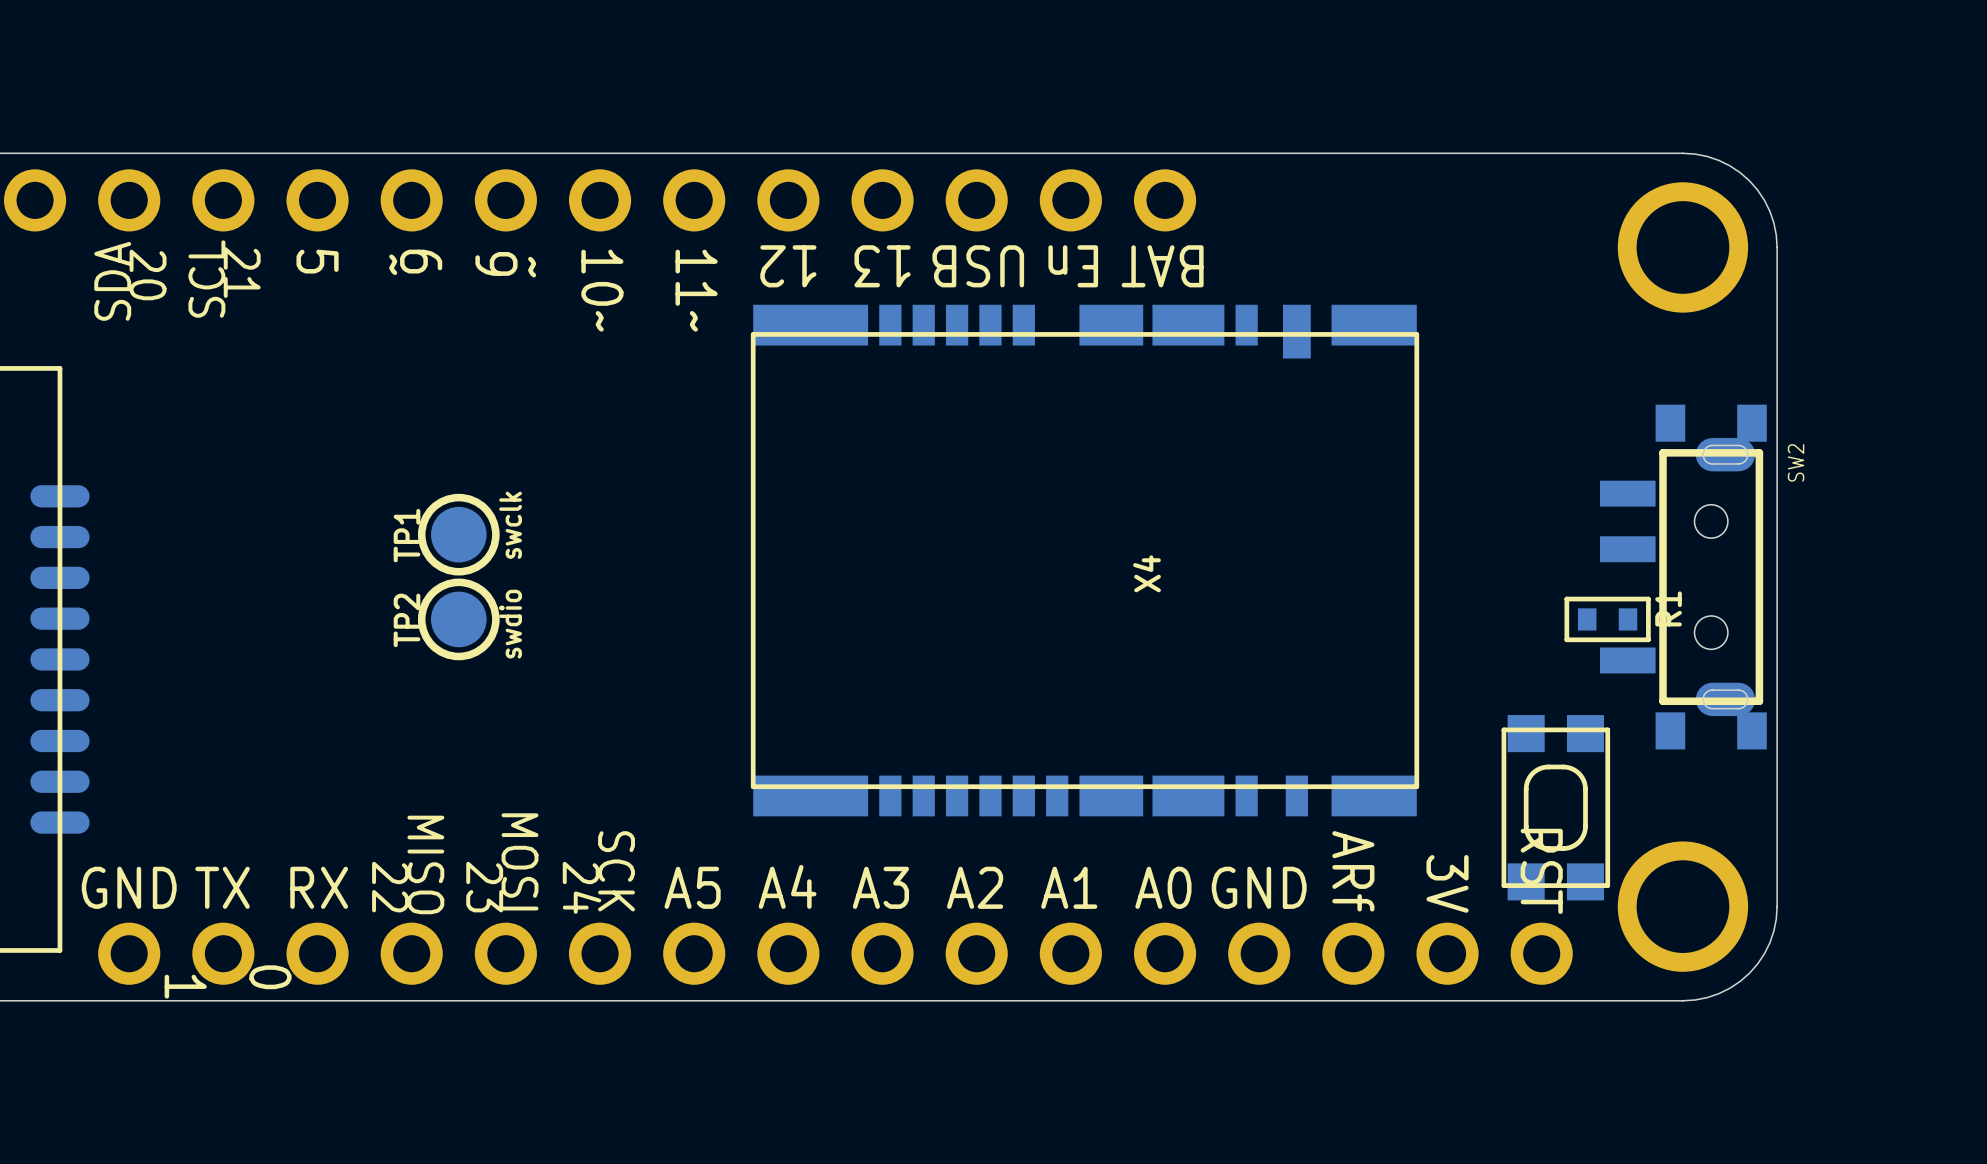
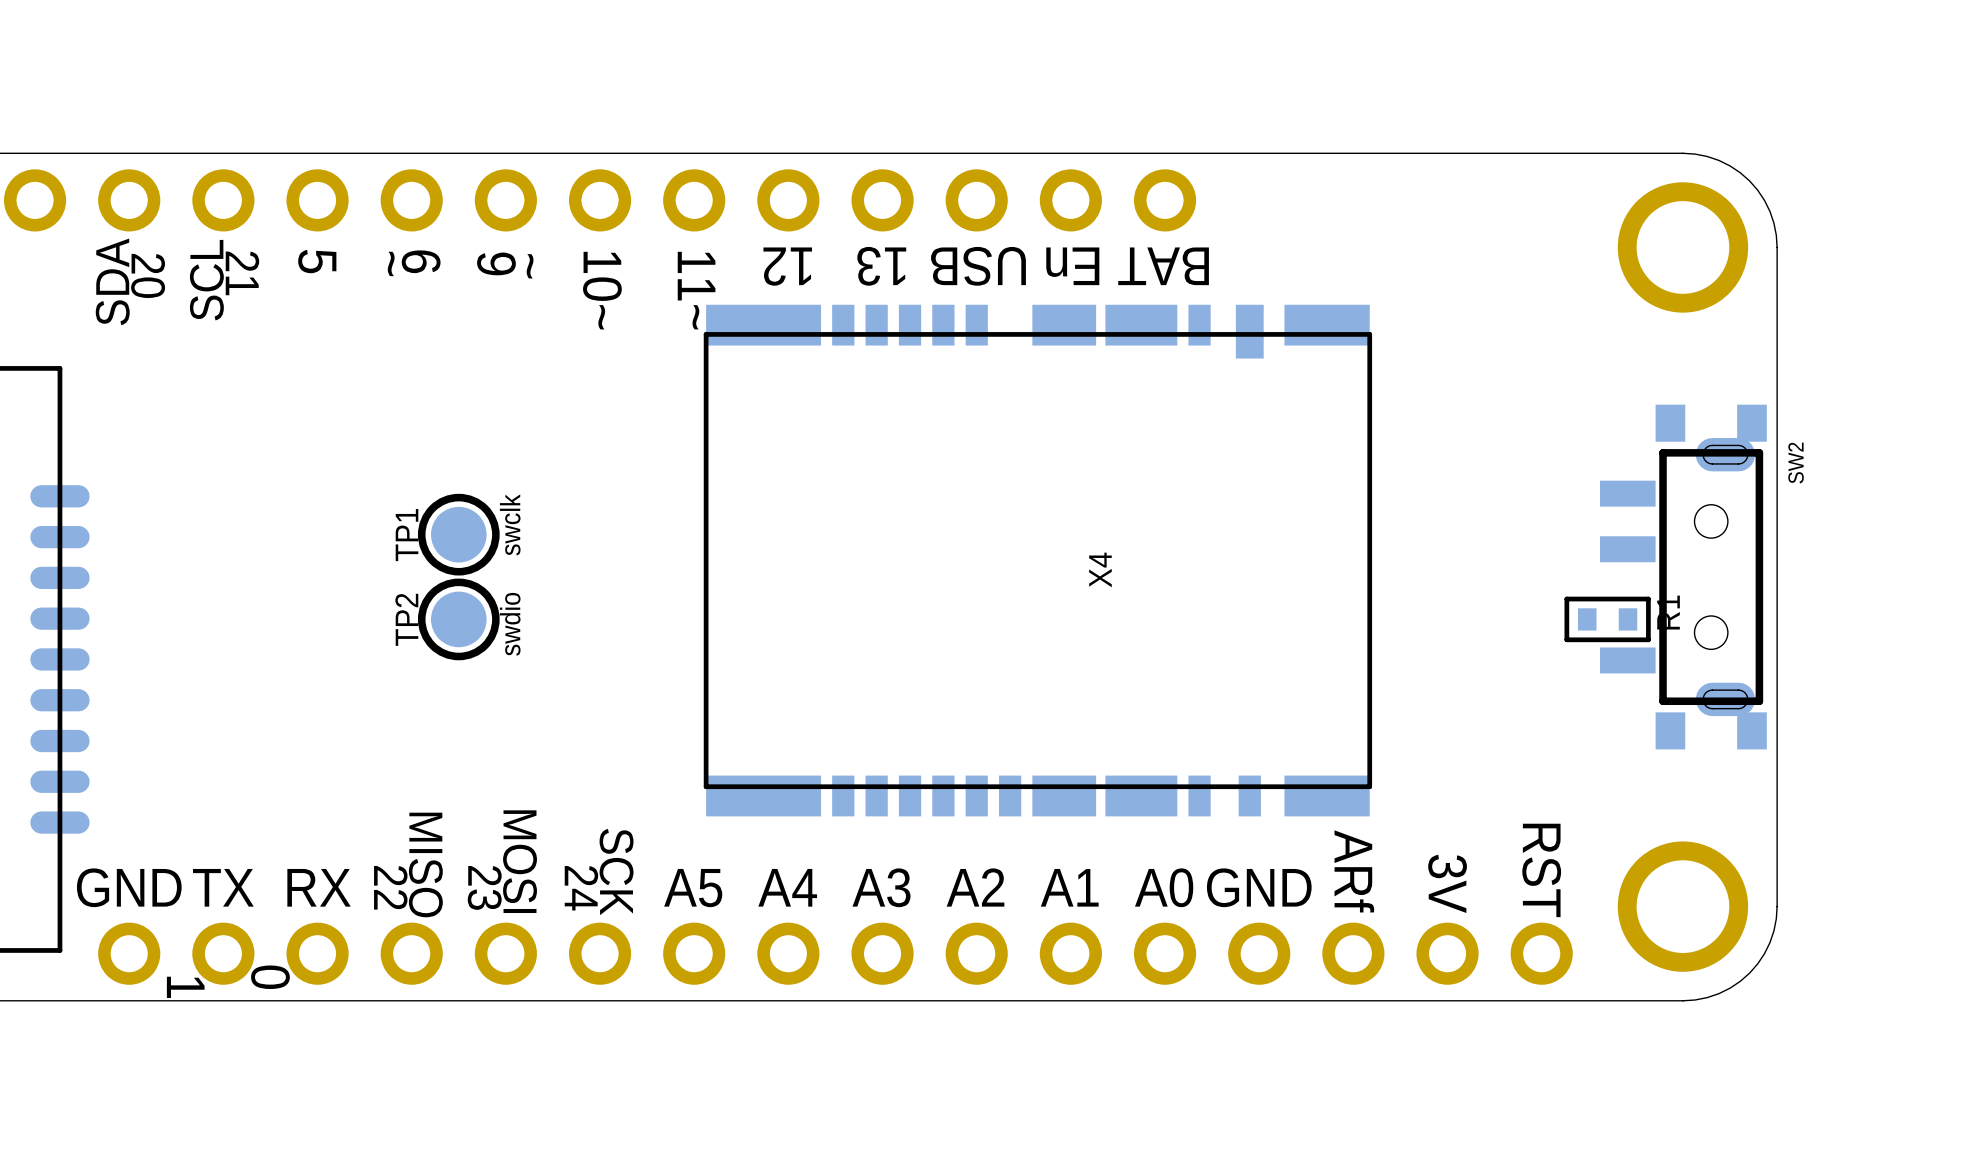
X4 position: (1085, 560) -> (1037, 560)
part: (1555, 807) -> none

